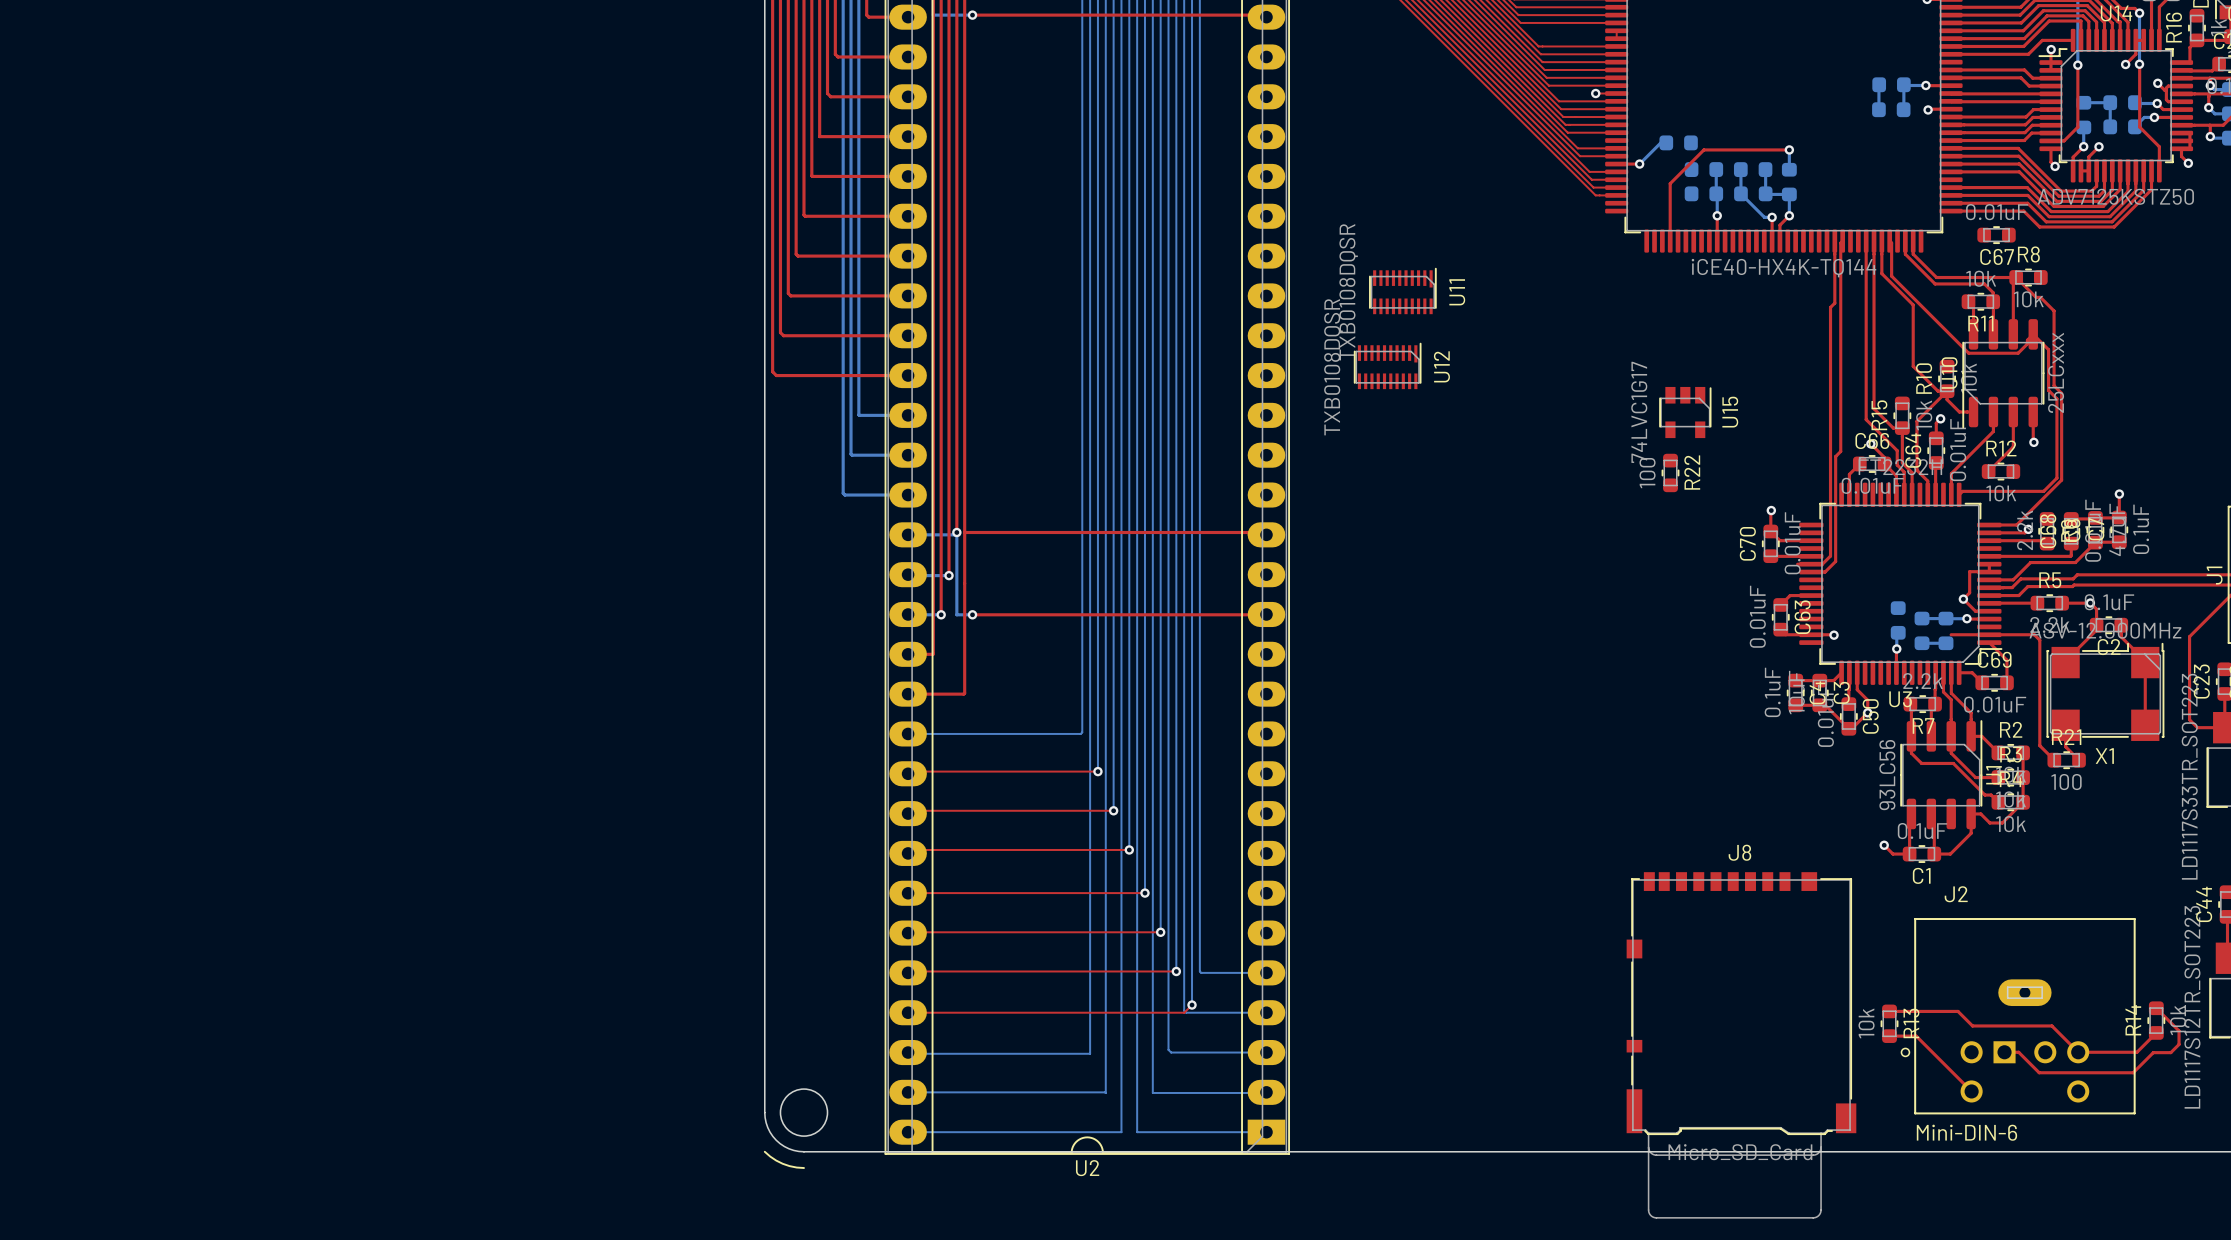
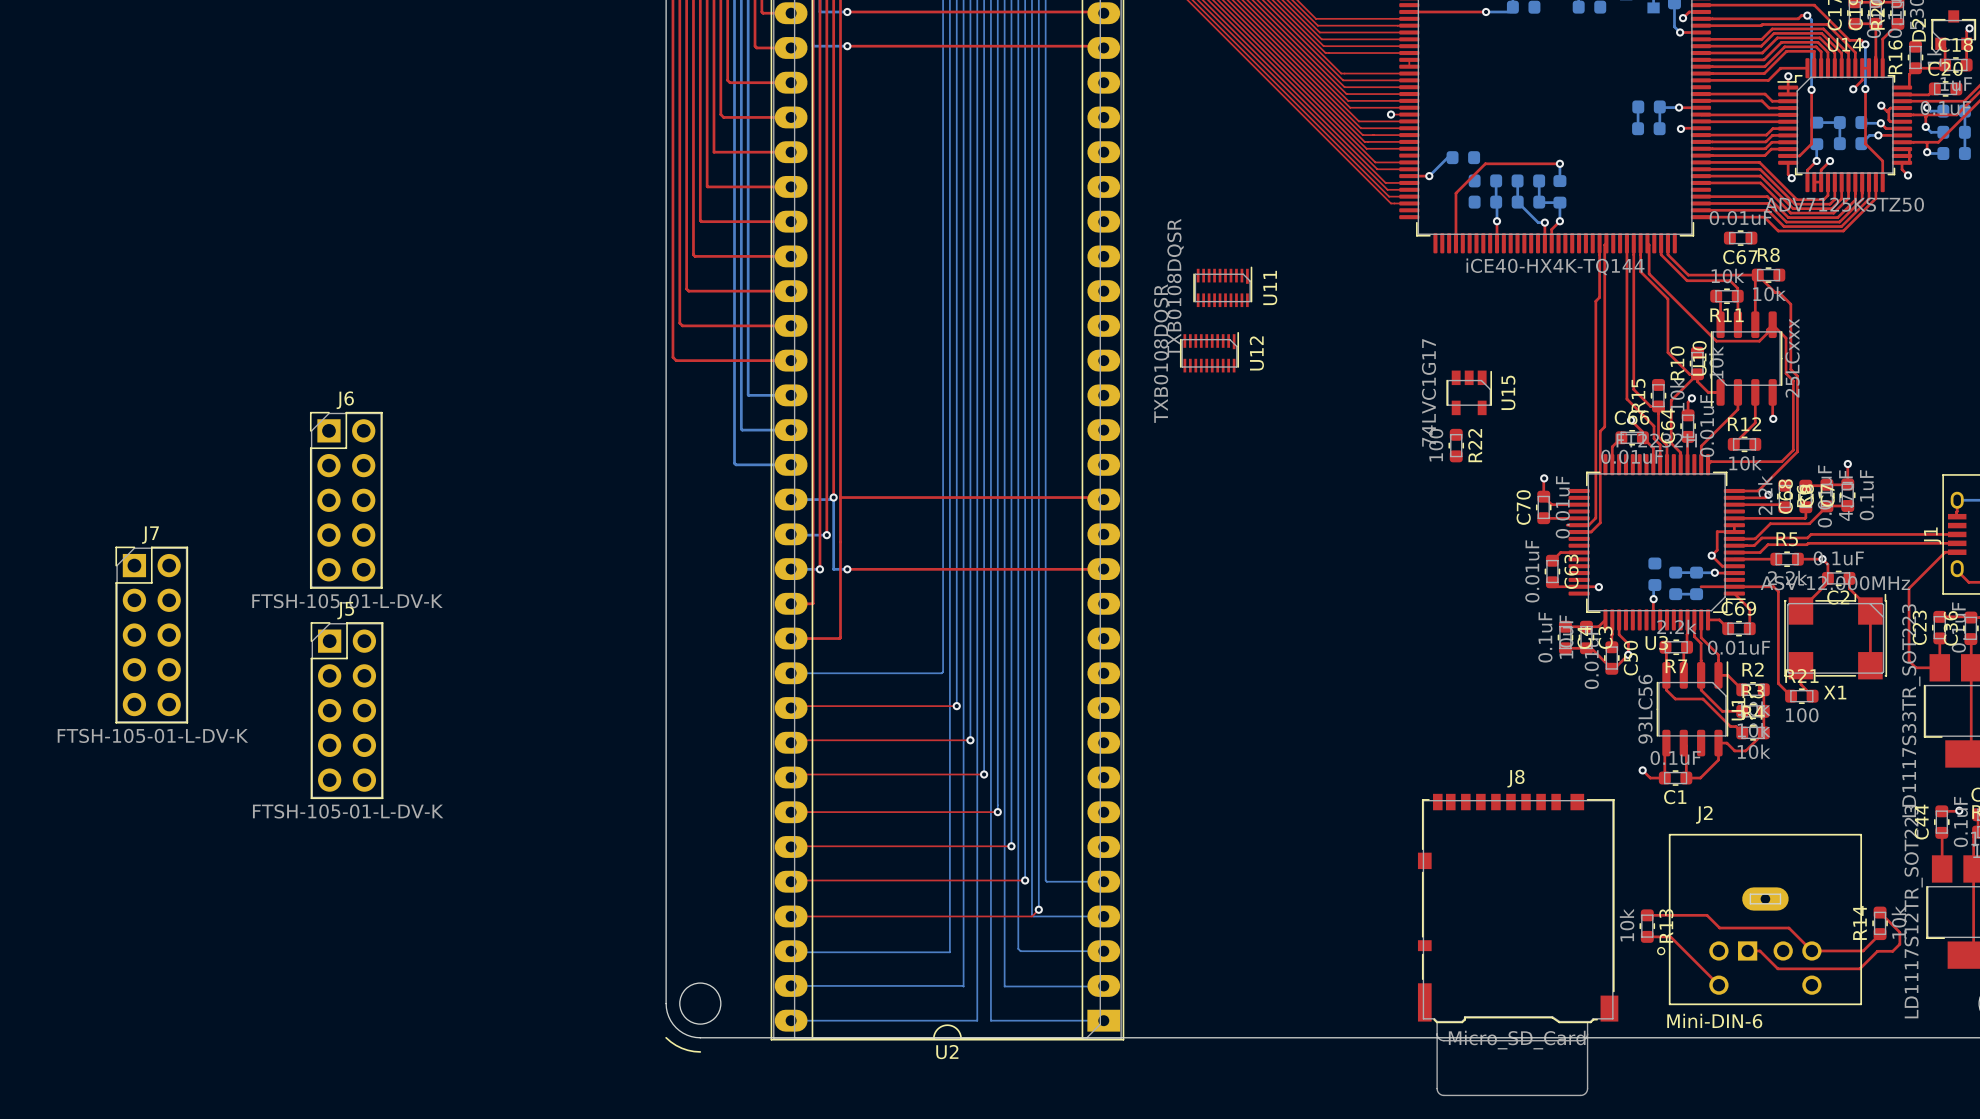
J6: none -> FTSH-105-01-L-DV-K (346, 500)
J7: none -> FTSH-105-01-L-DV-K (151, 635)
J5: none -> FTSH-105-01-L-DV-K (347, 710)

